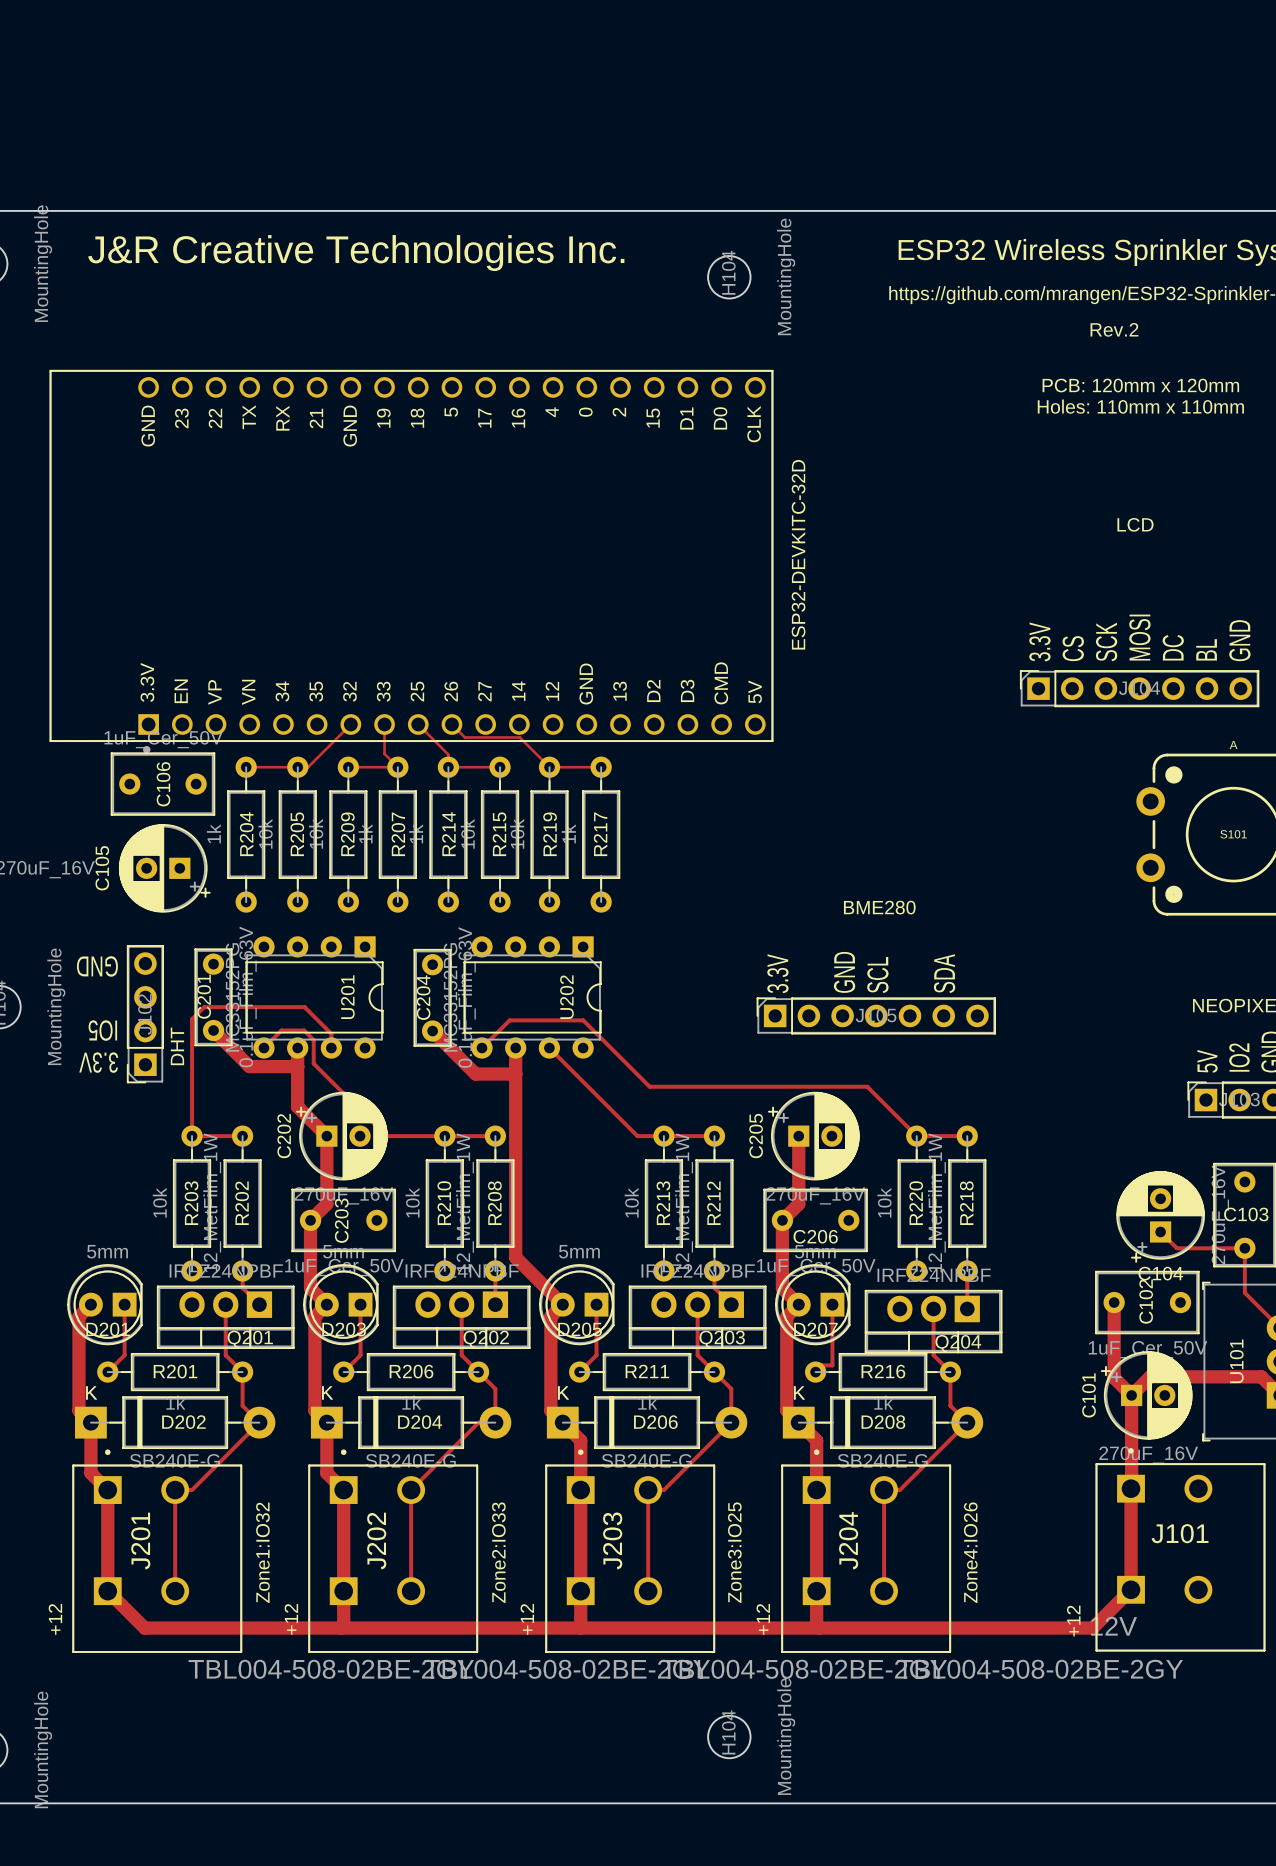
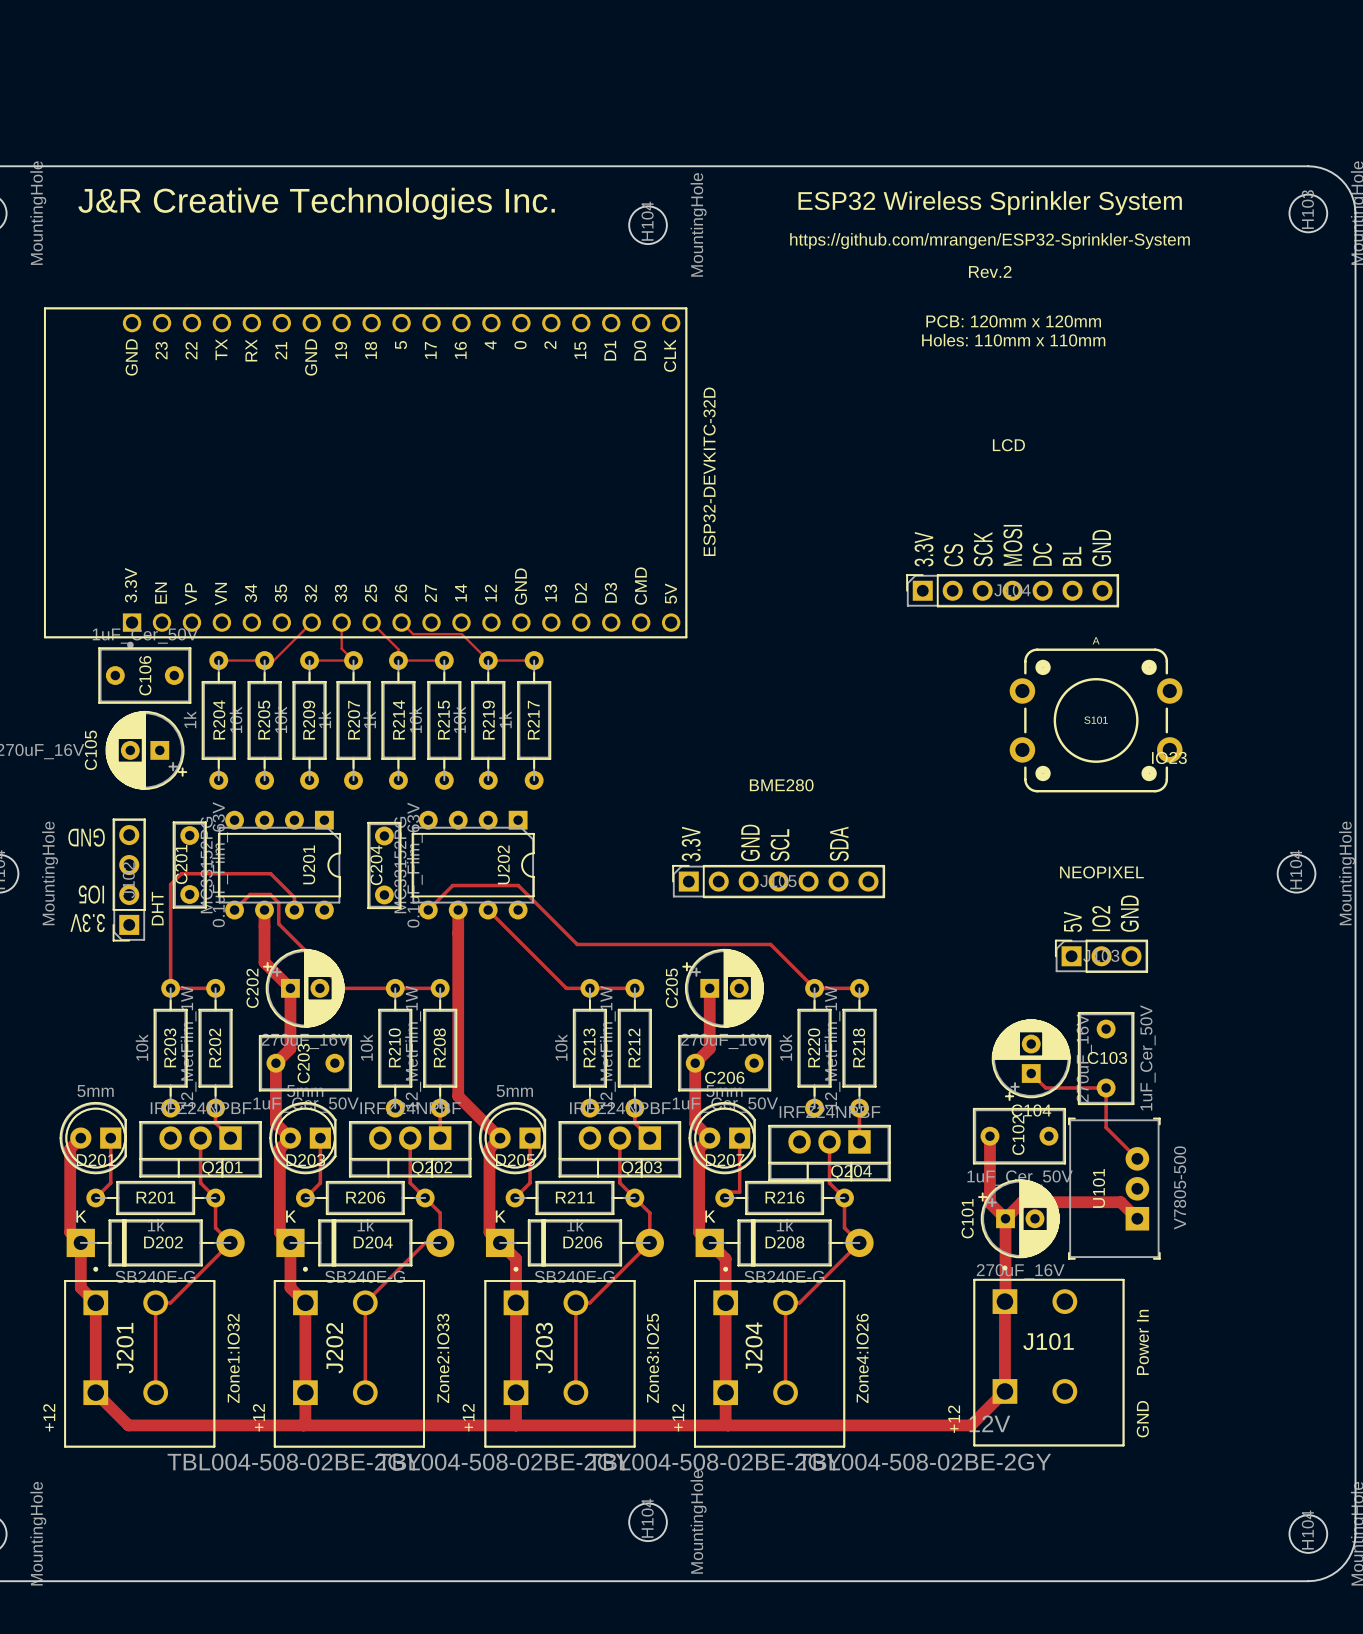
track: (213, 1030) (249, 1066) (297, 1066) -> none
track: (432, 1031) (475, 1074) (515, 1074) -> none

